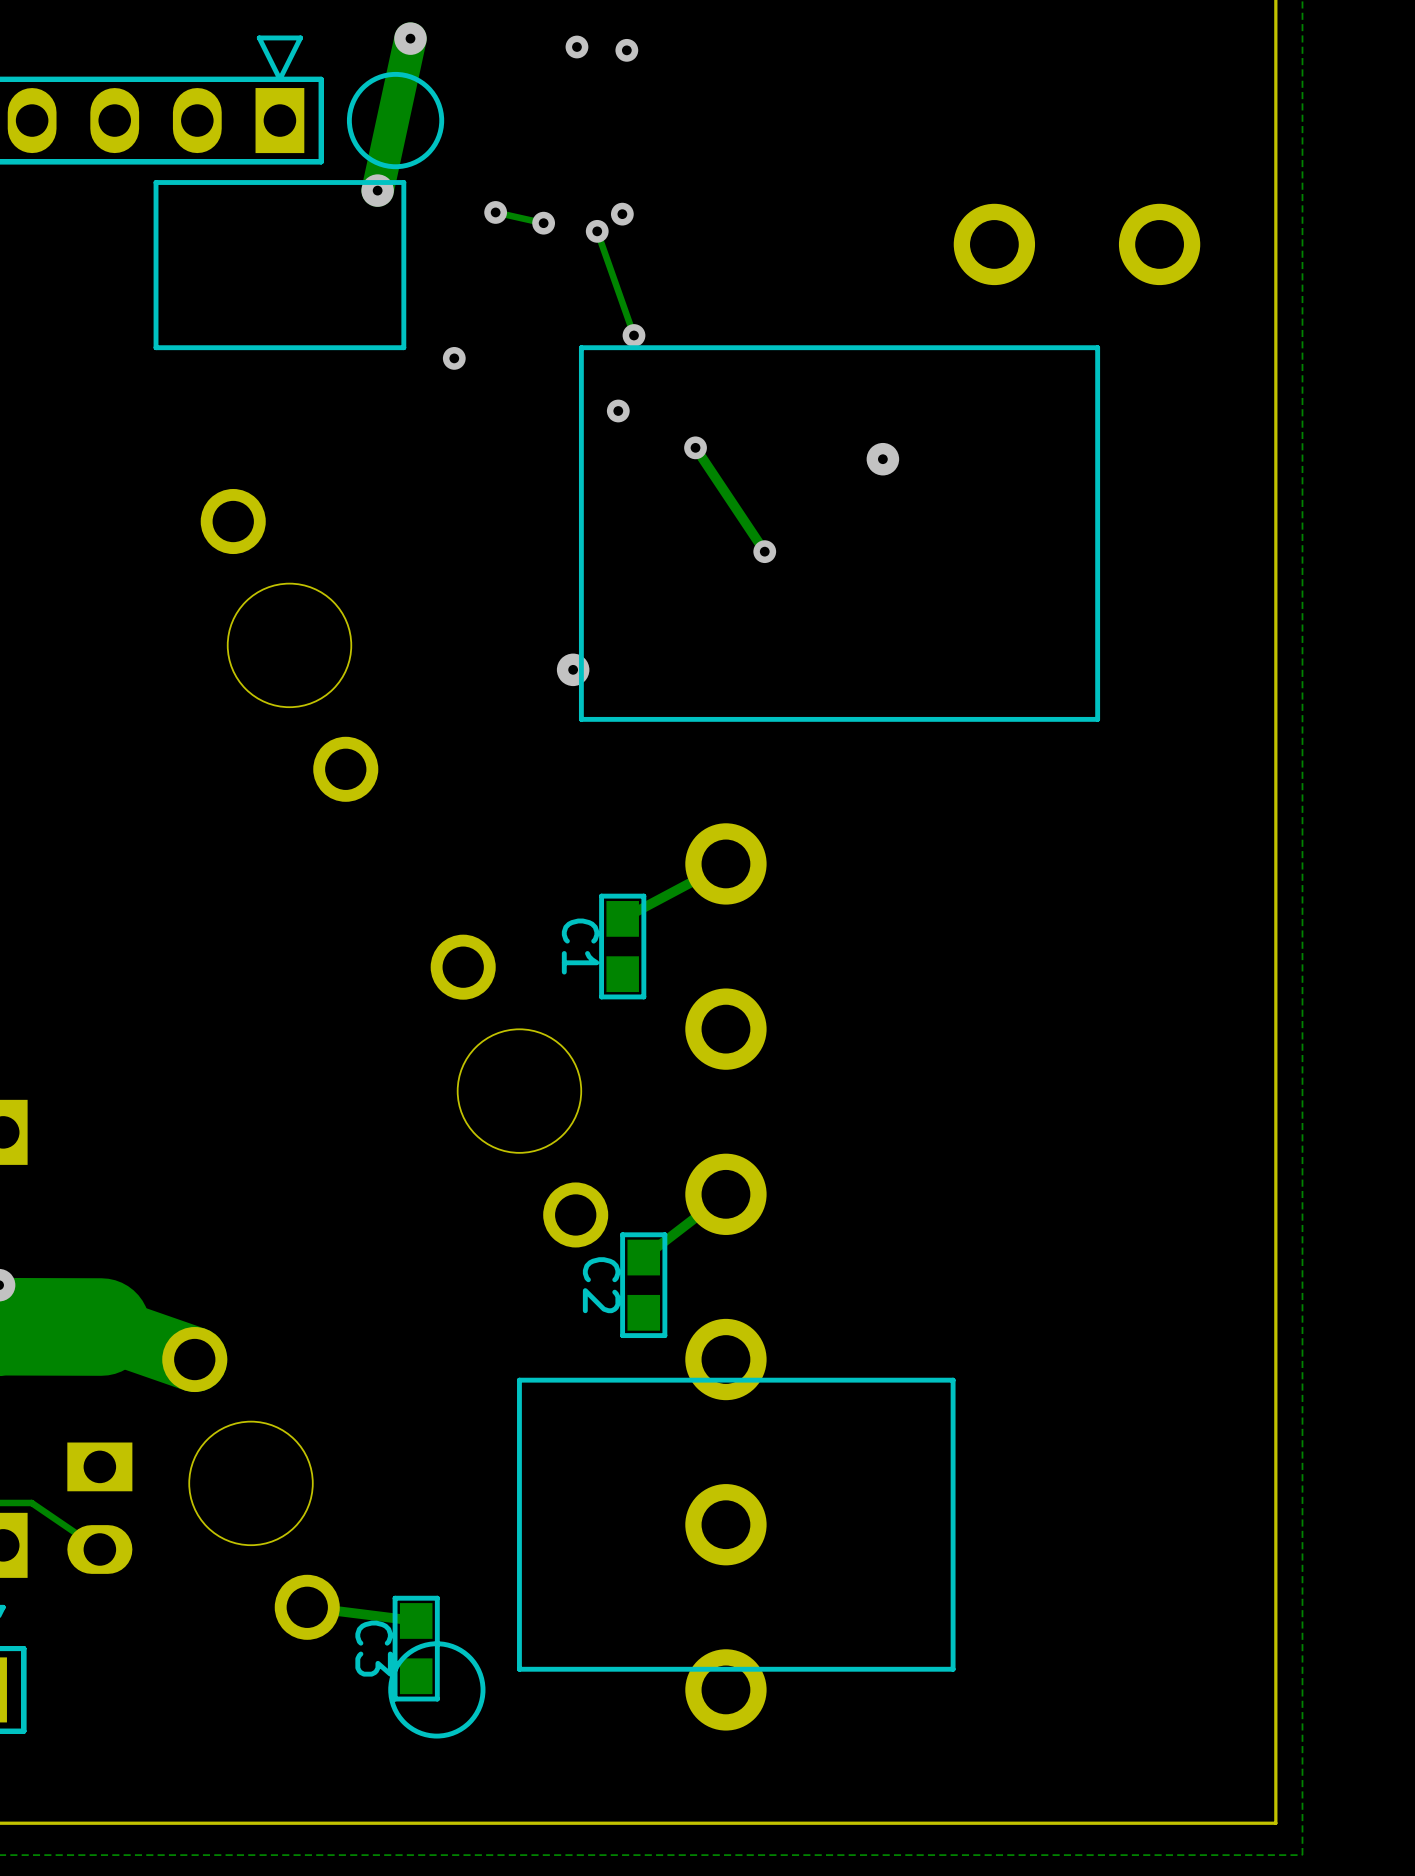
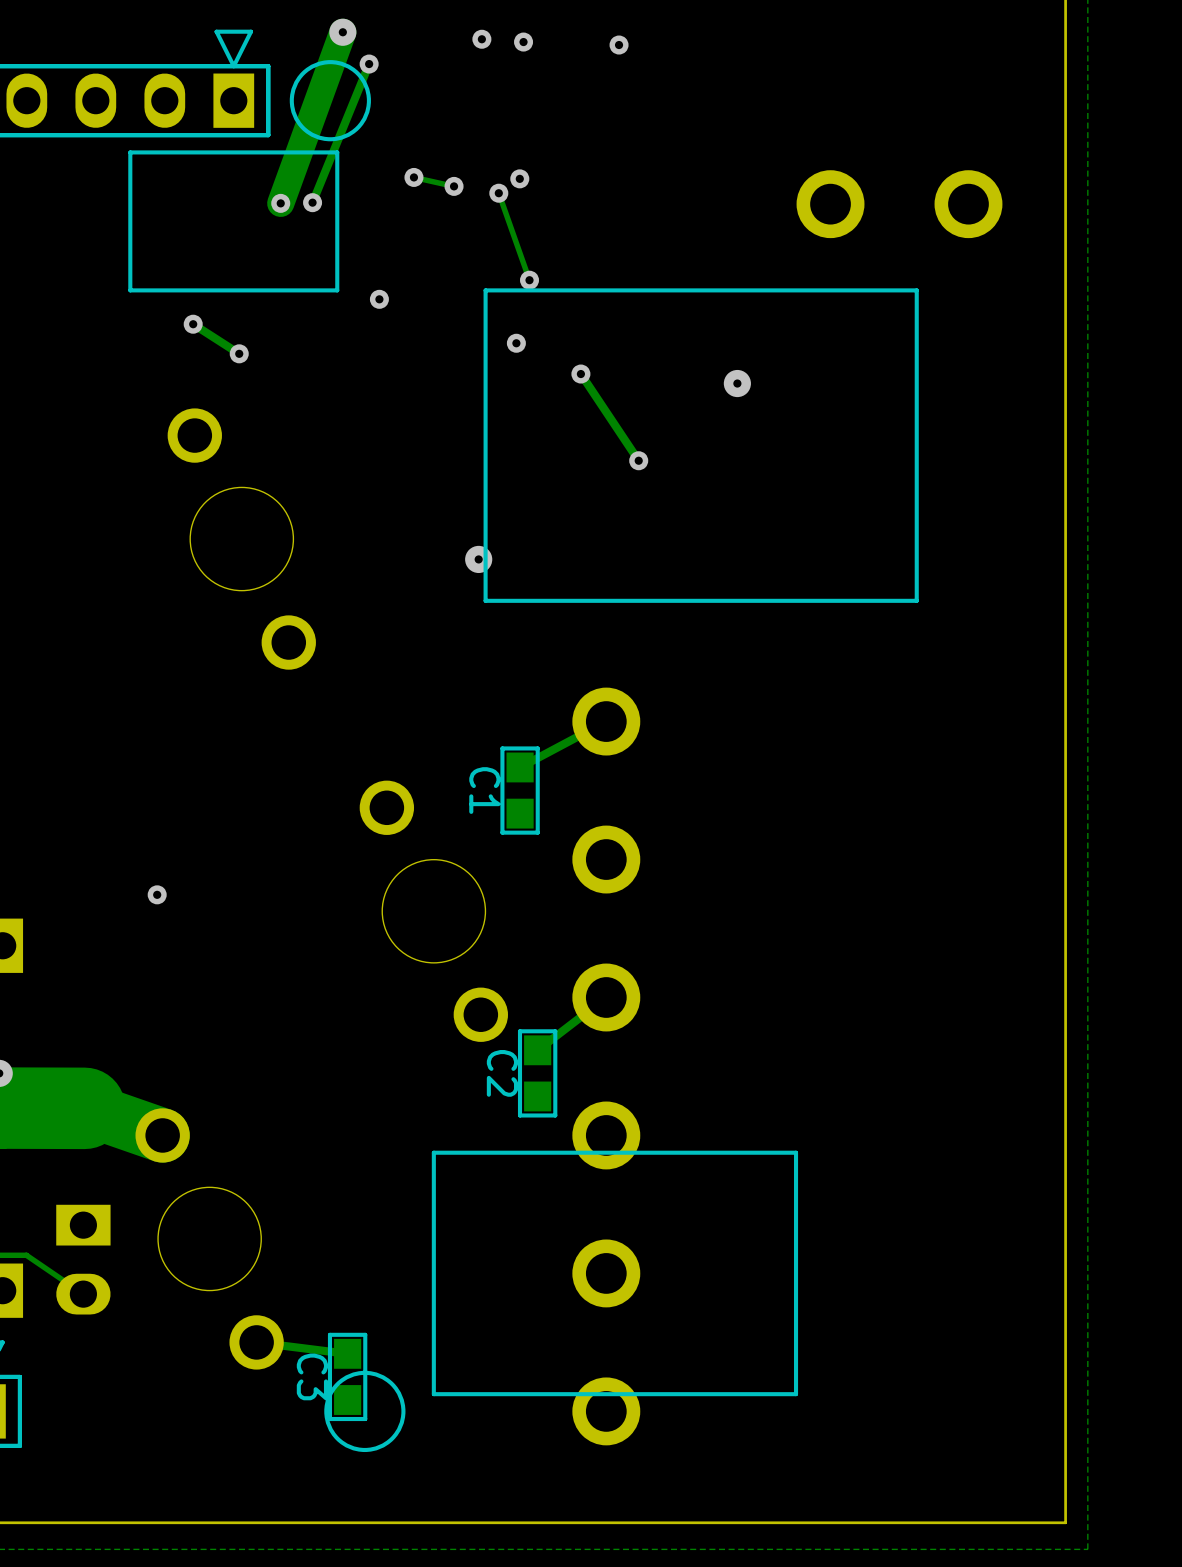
track: (410, 38) (377, 190) -> (342, 32) (280, 203)
via: none -> (619, 45)
track: none -> (369, 64) (312, 202)
via: none -> (369, 64)
via: (377, 190) -> none
via: none -> (312, 202)
via: none -> (280, 203)
track: none -> (193, 324) (239, 353)
via: none -> (193, 324)
via: none -> (239, 353)
via: none -> (157, 894)

